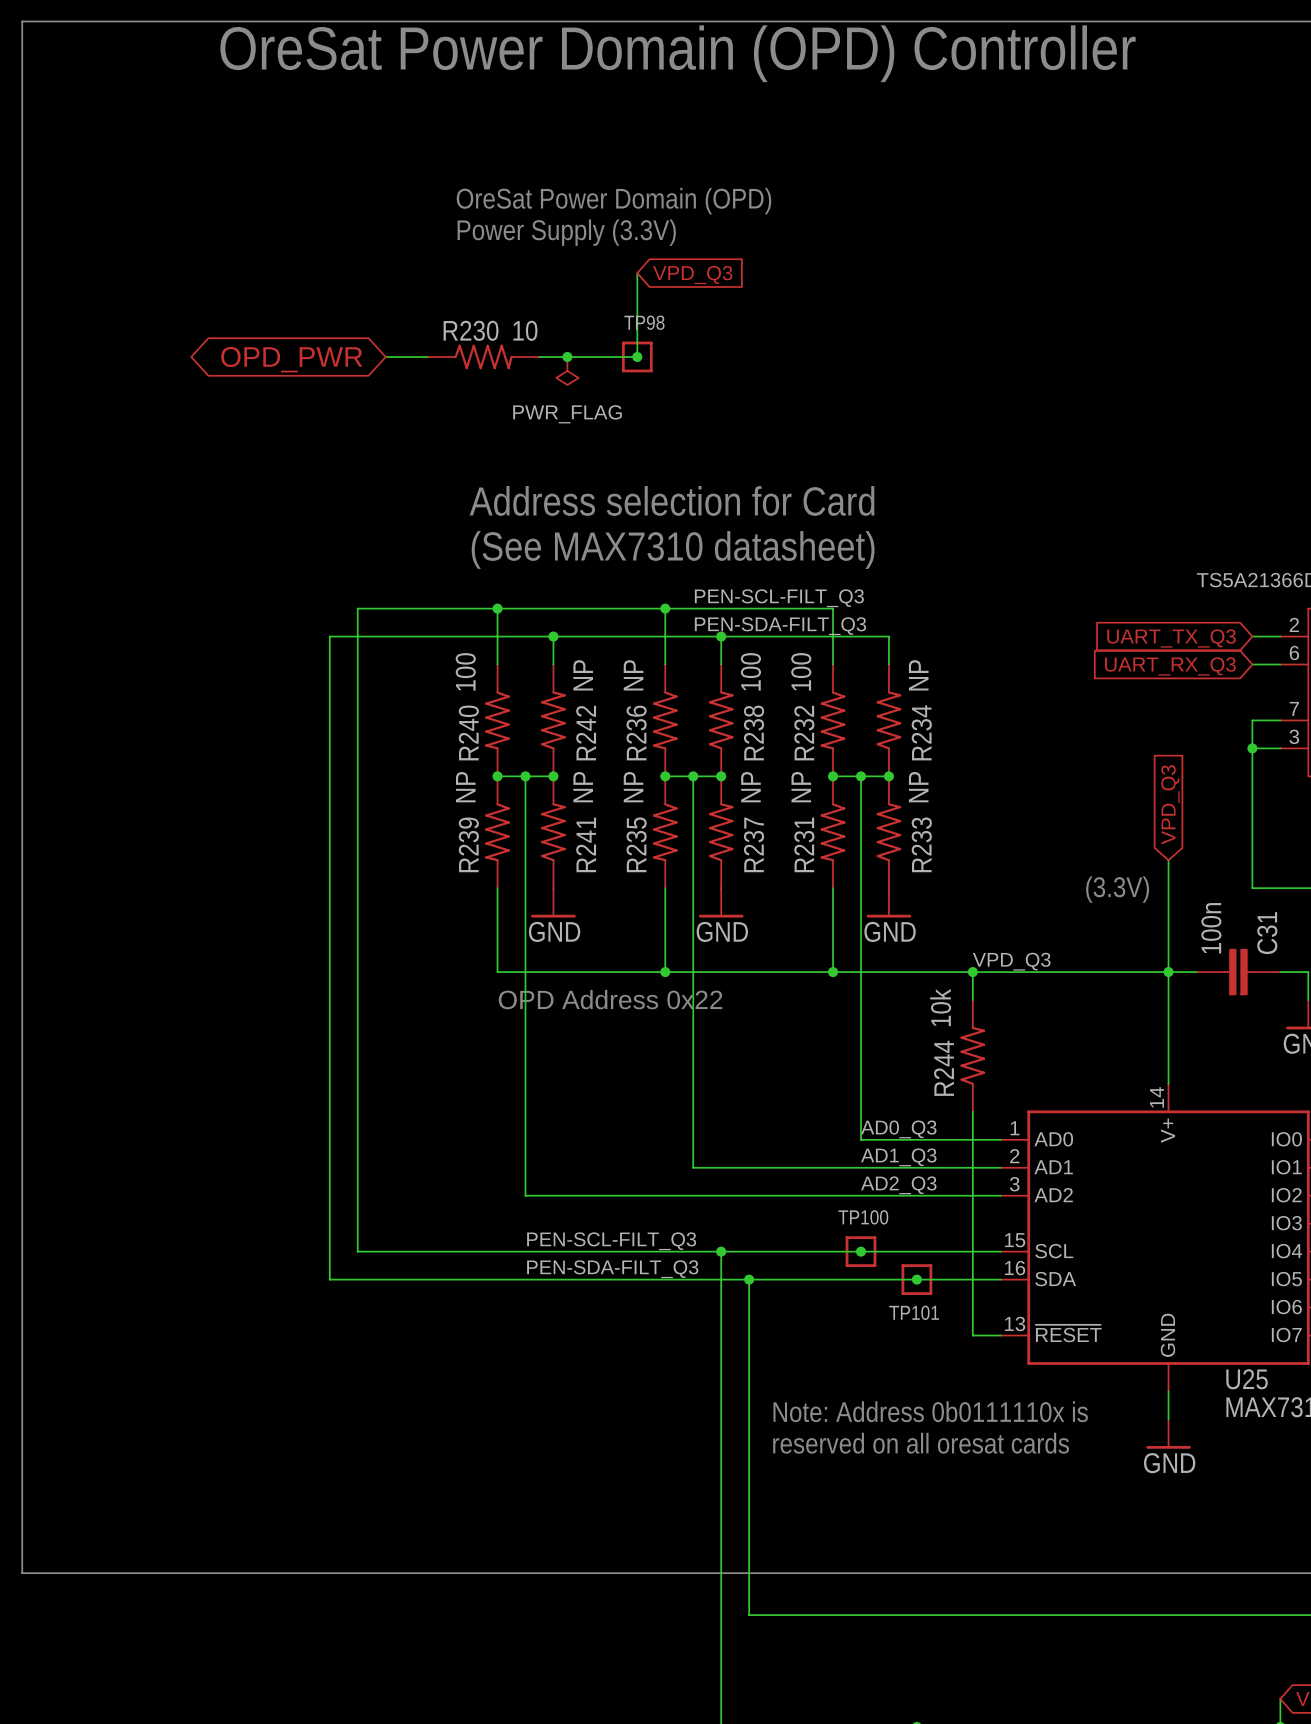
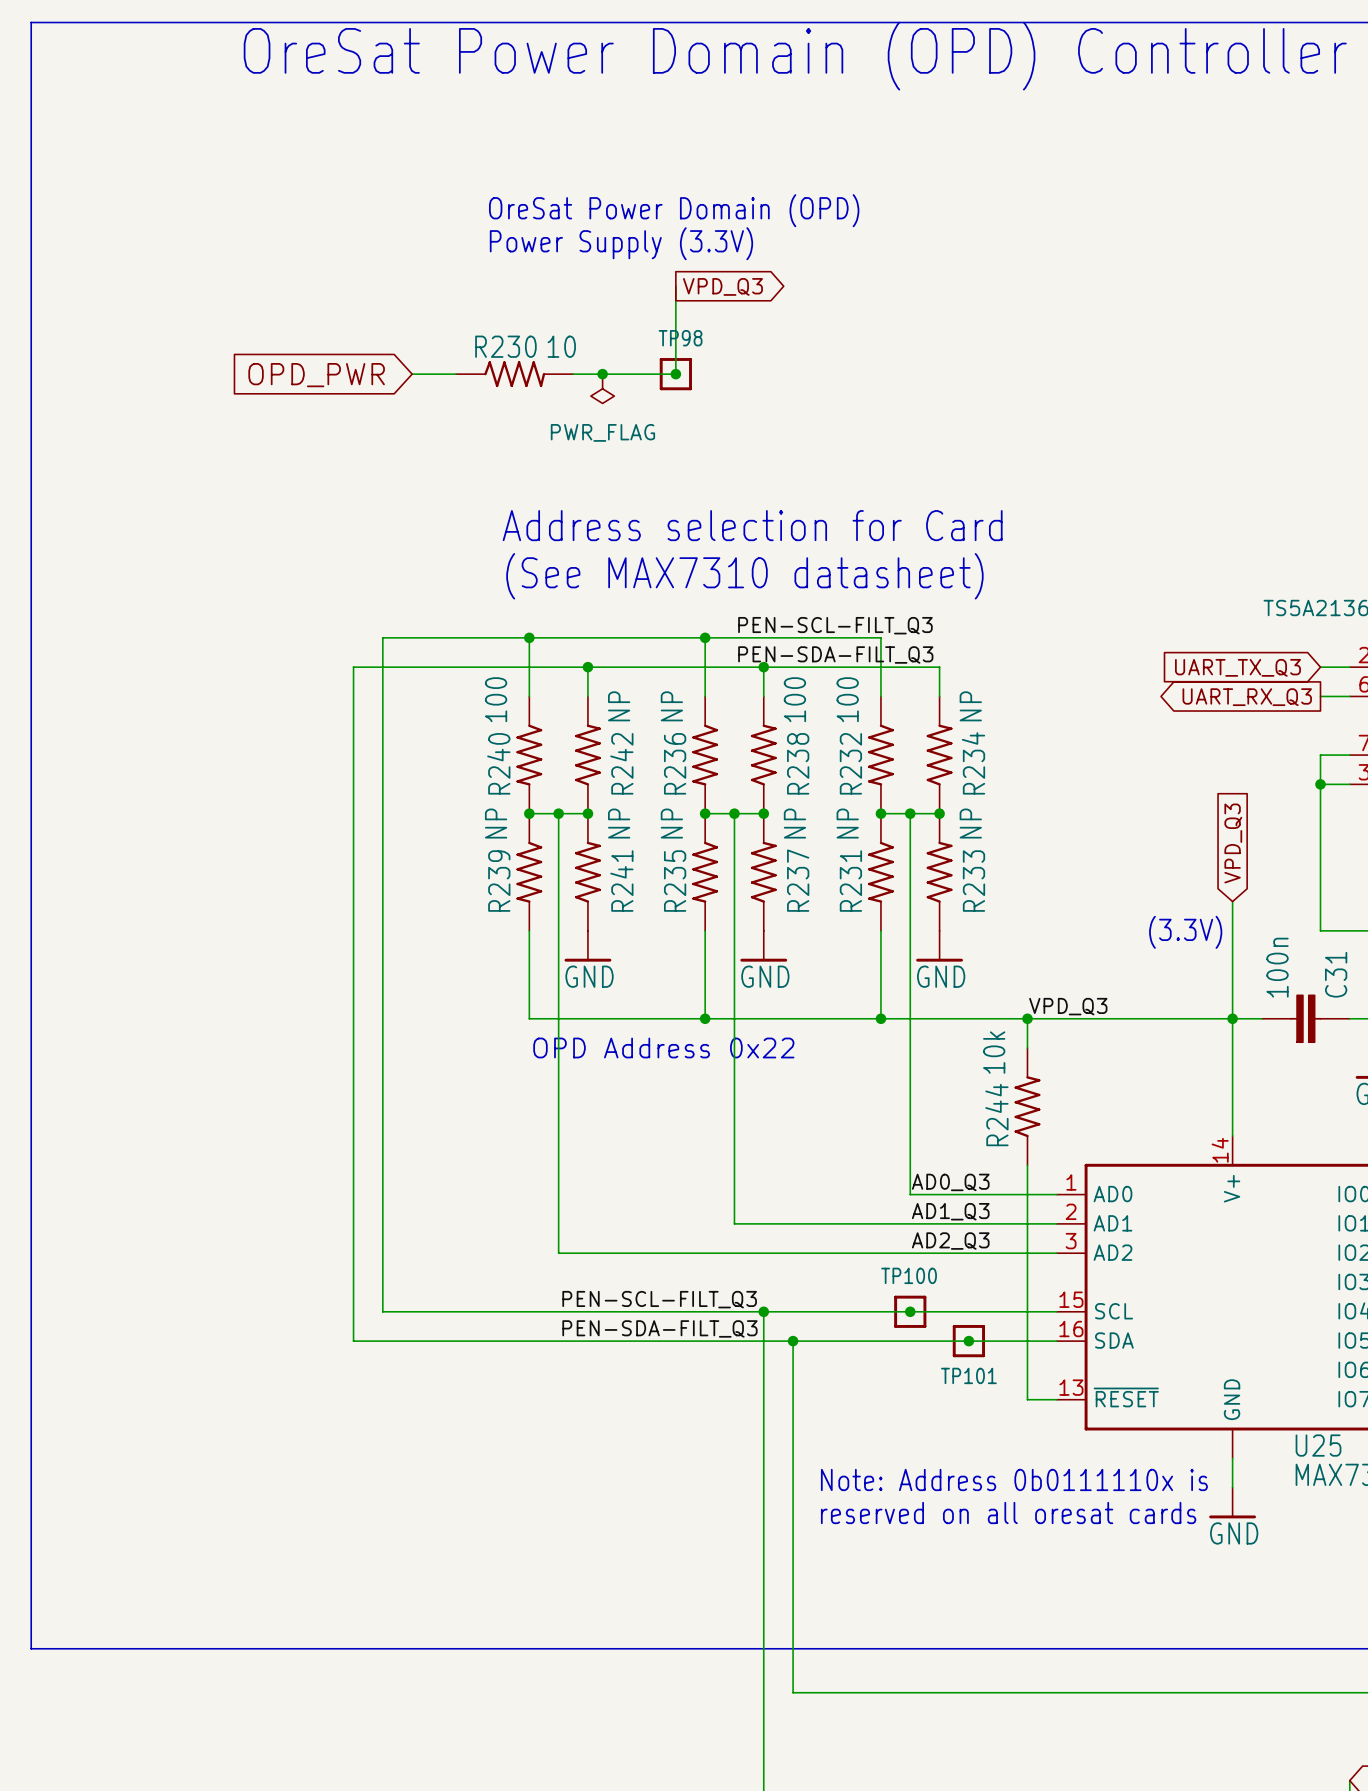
global label shape: input (692, 275) -> output (722, 286)
global label shape: bidirectional (291, 359) -> input (316, 375)
global label shape: input (1170, 666) -> output (1247, 697)

